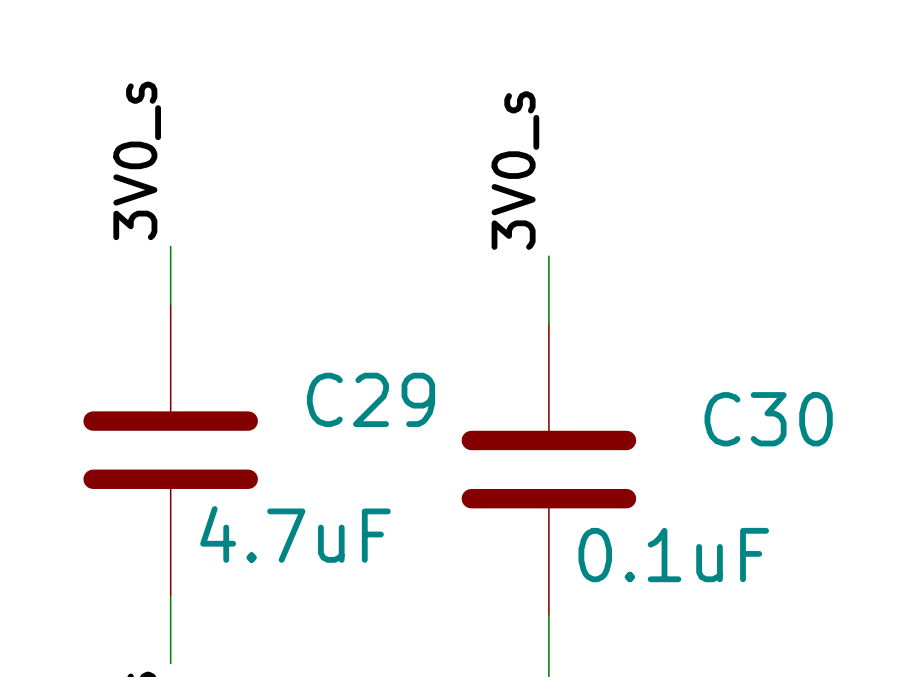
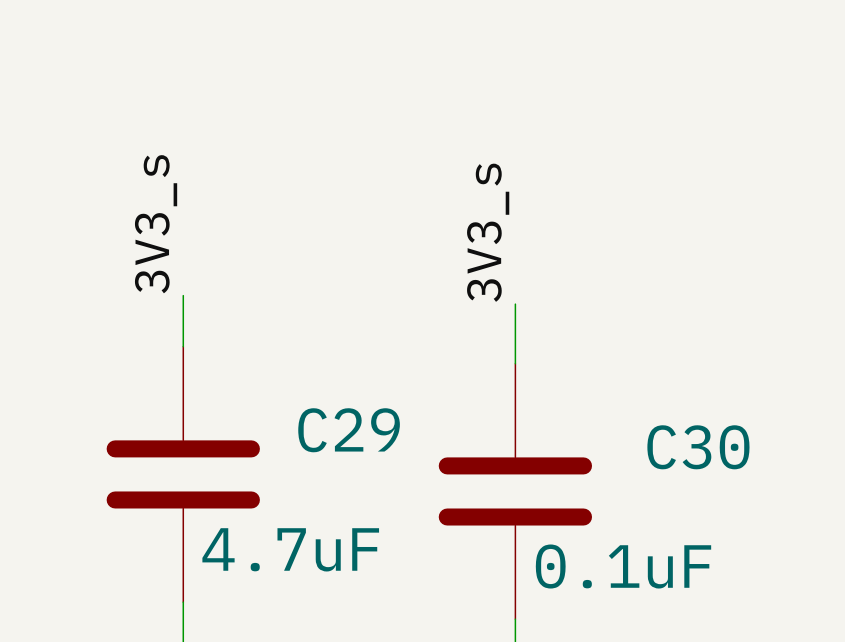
label: 3V0_s (137, 160) -> 3V3_s (156, 224)
label: 3V0_s (515, 170) -> 3V3_s (488, 232)

